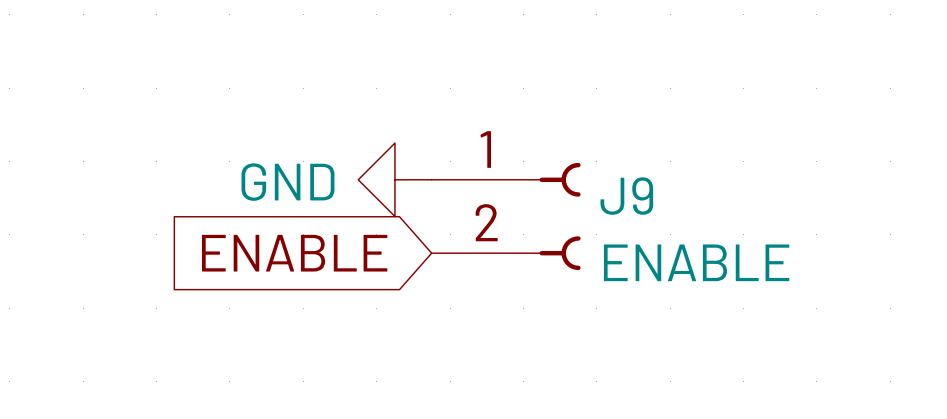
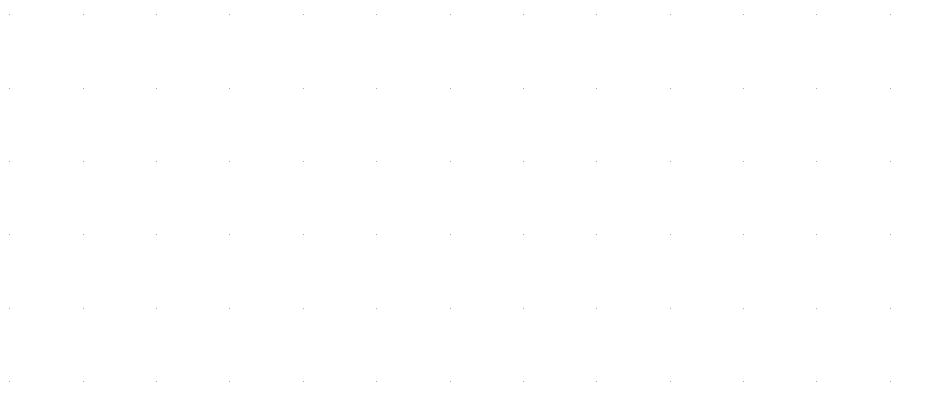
power symbol: GND (394, 179) -> none
J9: ENABLE (506, 216) -> none
global label: ENABLE (294, 253) -> none

